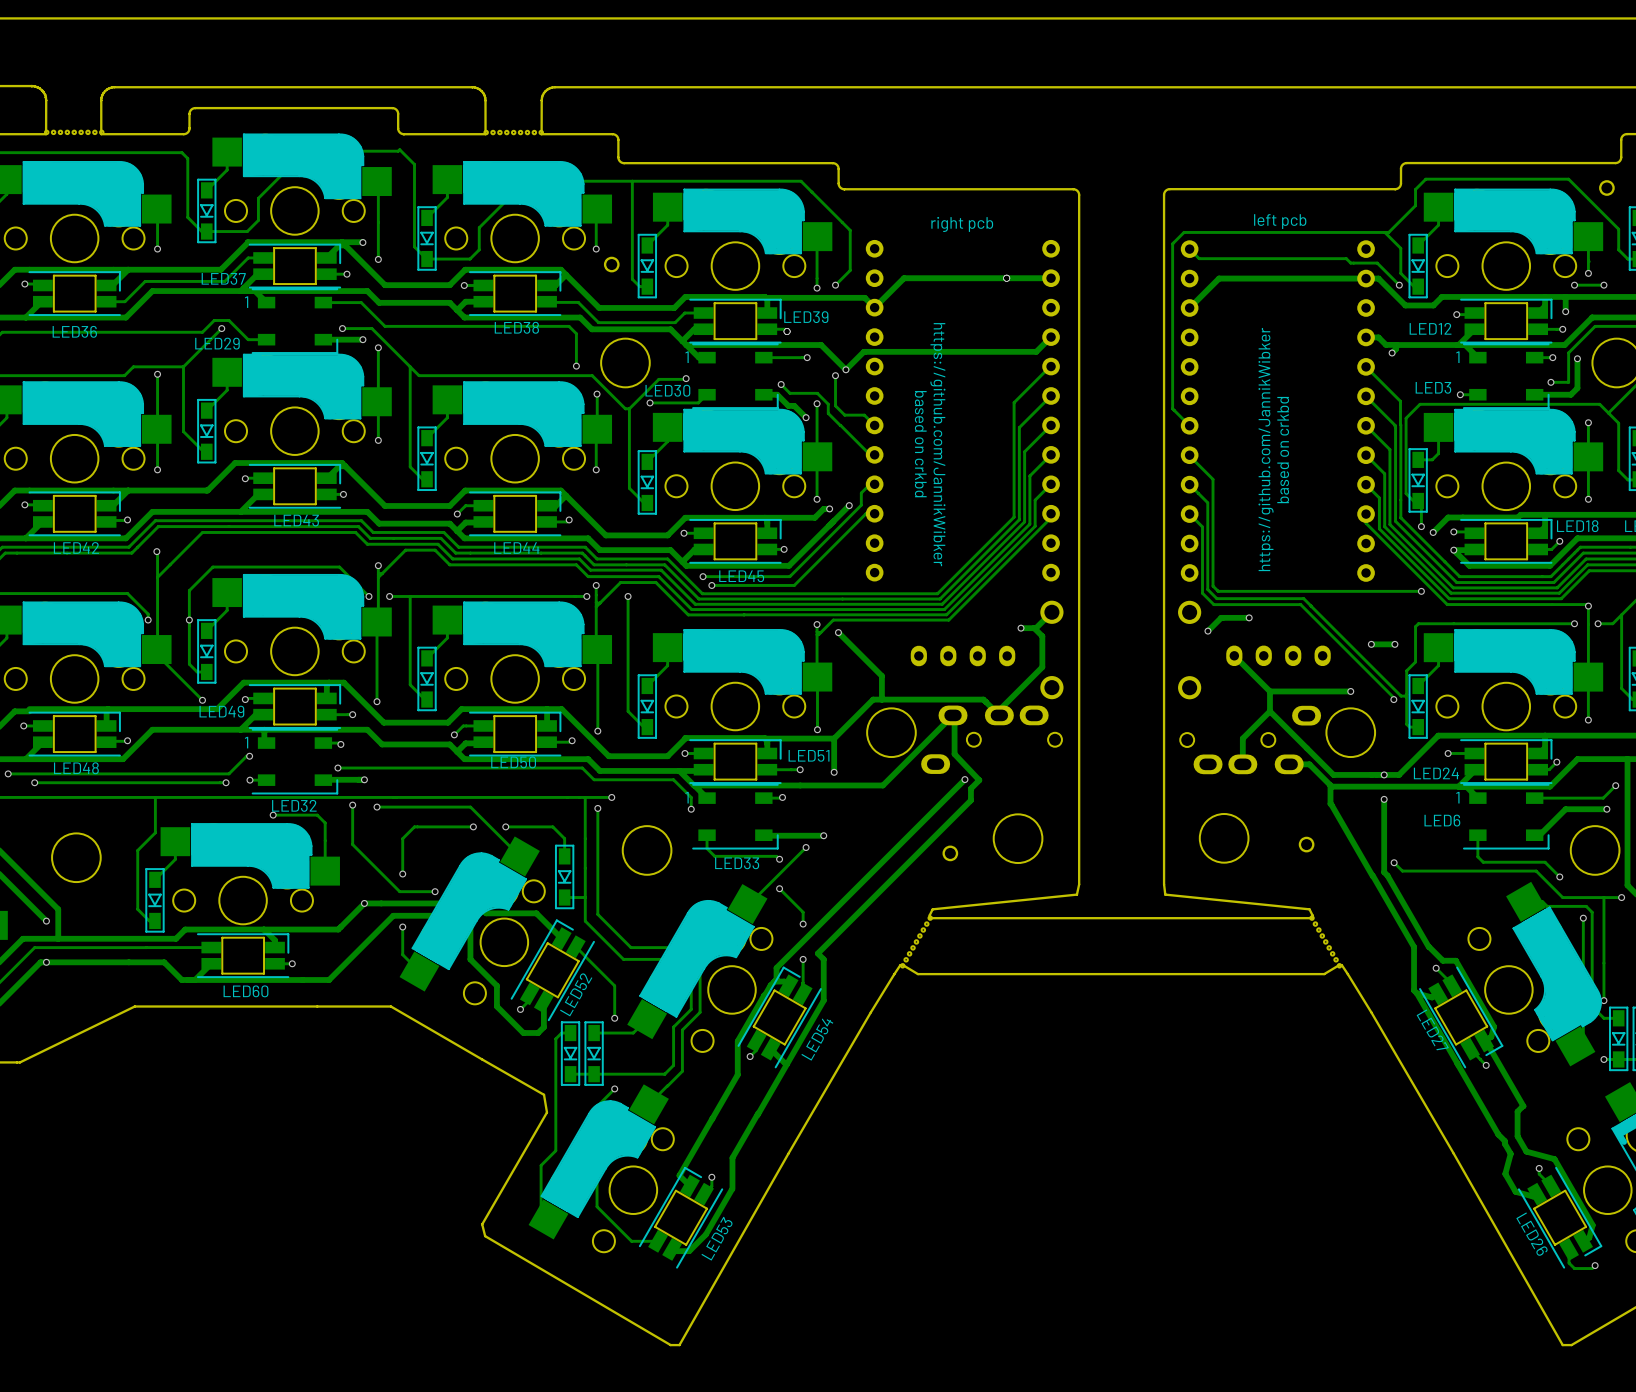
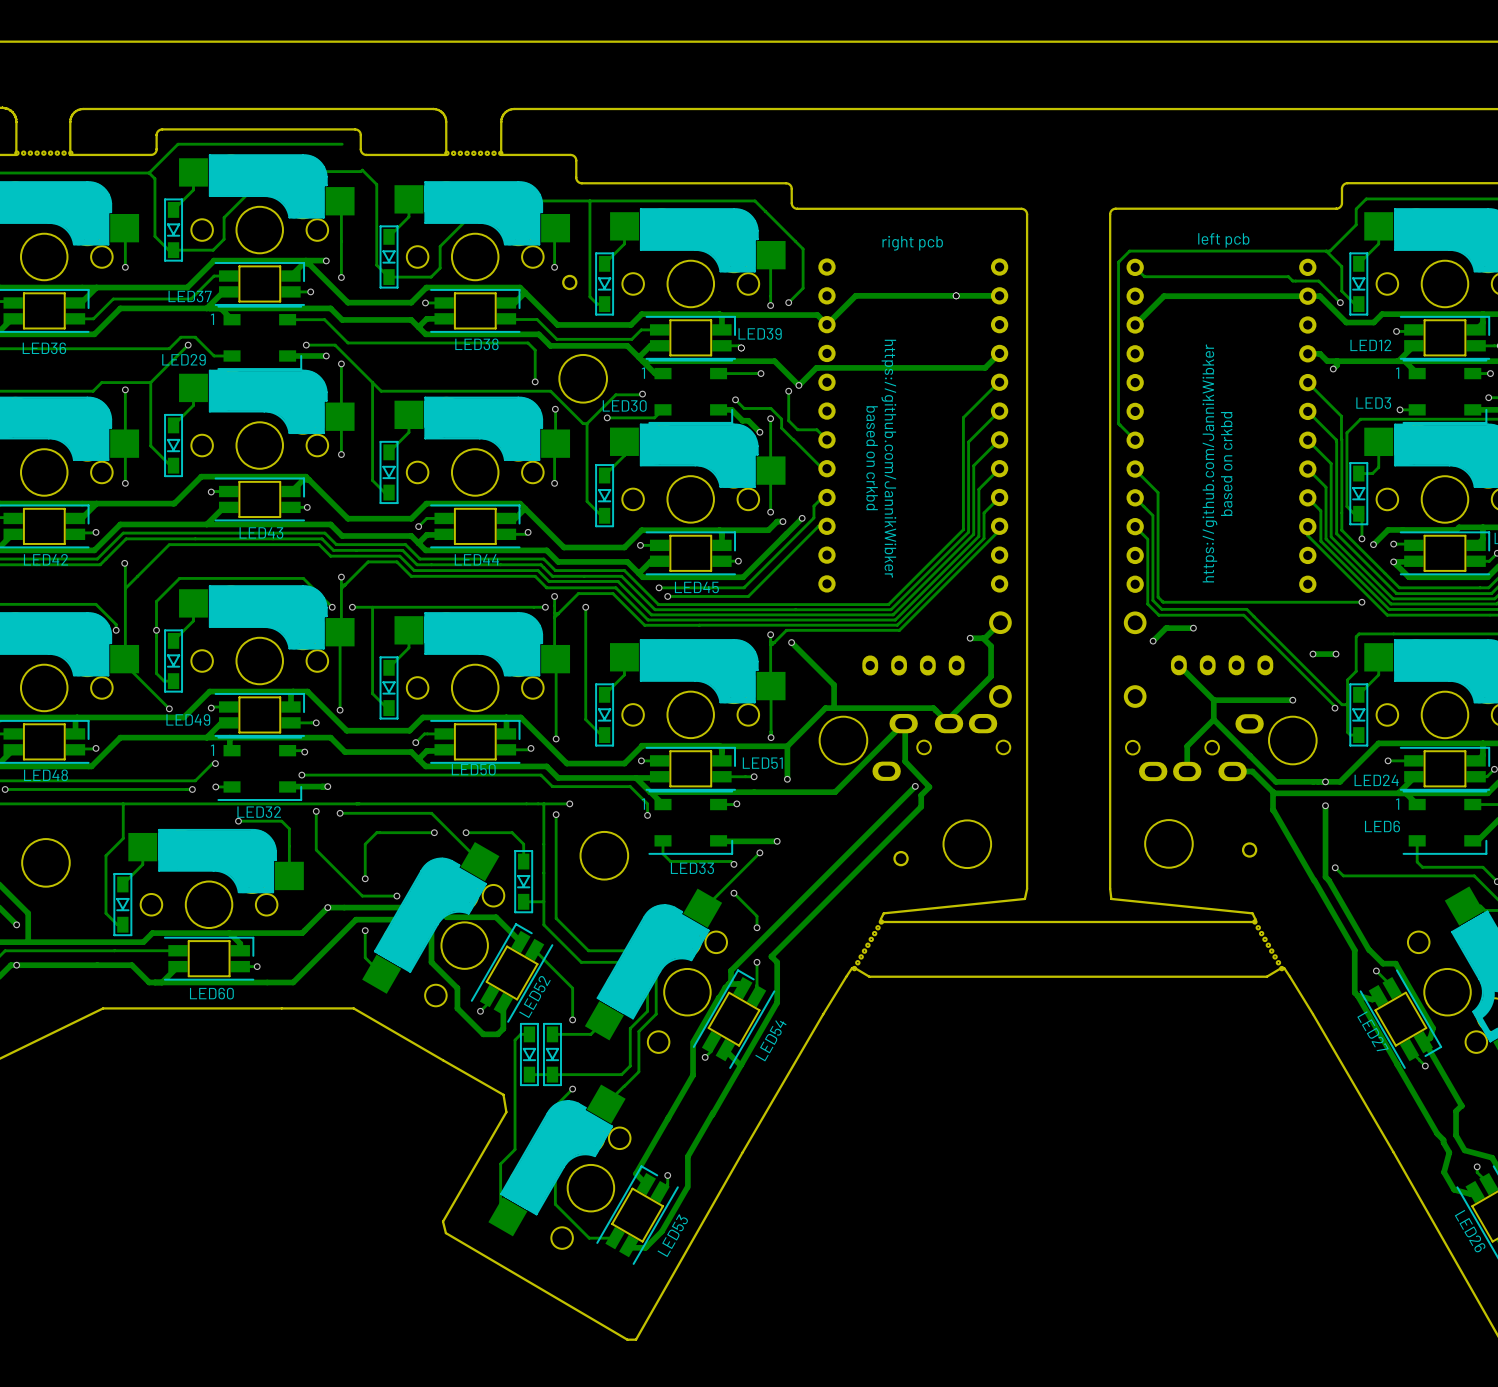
track: none -> (342, 144) (178, 144) (149, 173)

